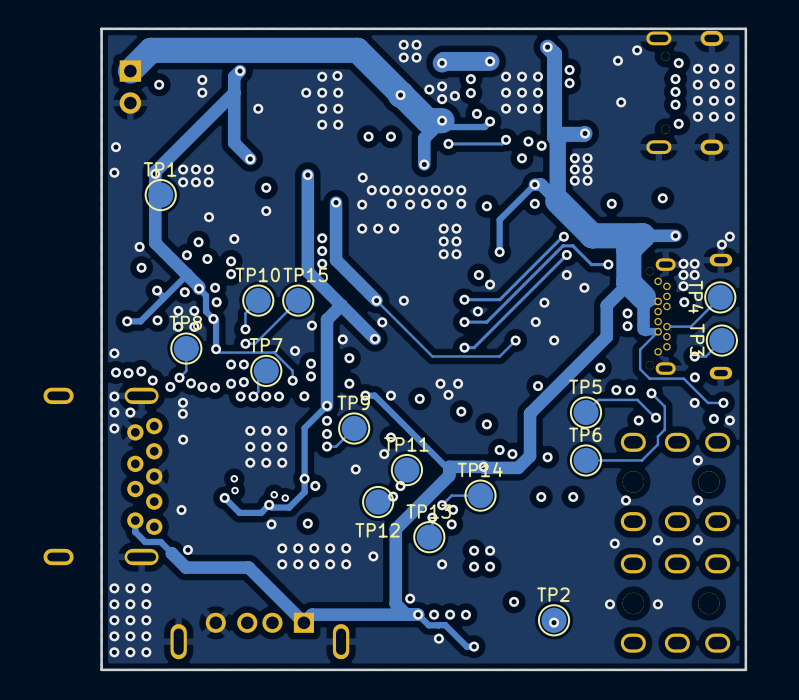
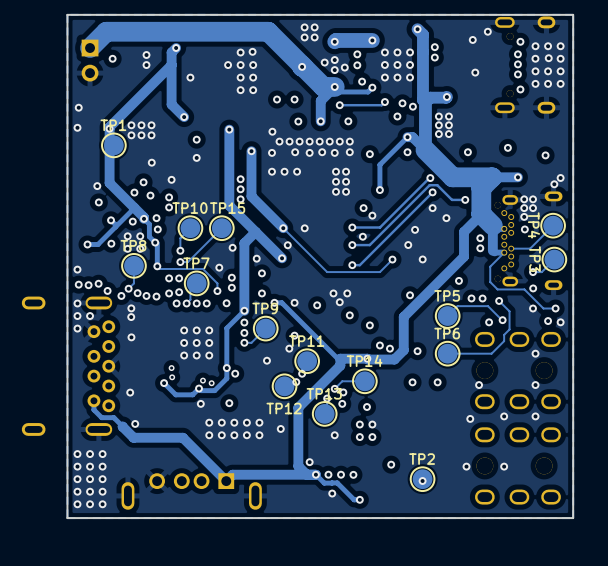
via: none -> (298, 121)
via: none -> (348, 121)
via: none -> (545, 155)
via: none -> (366, 407)

